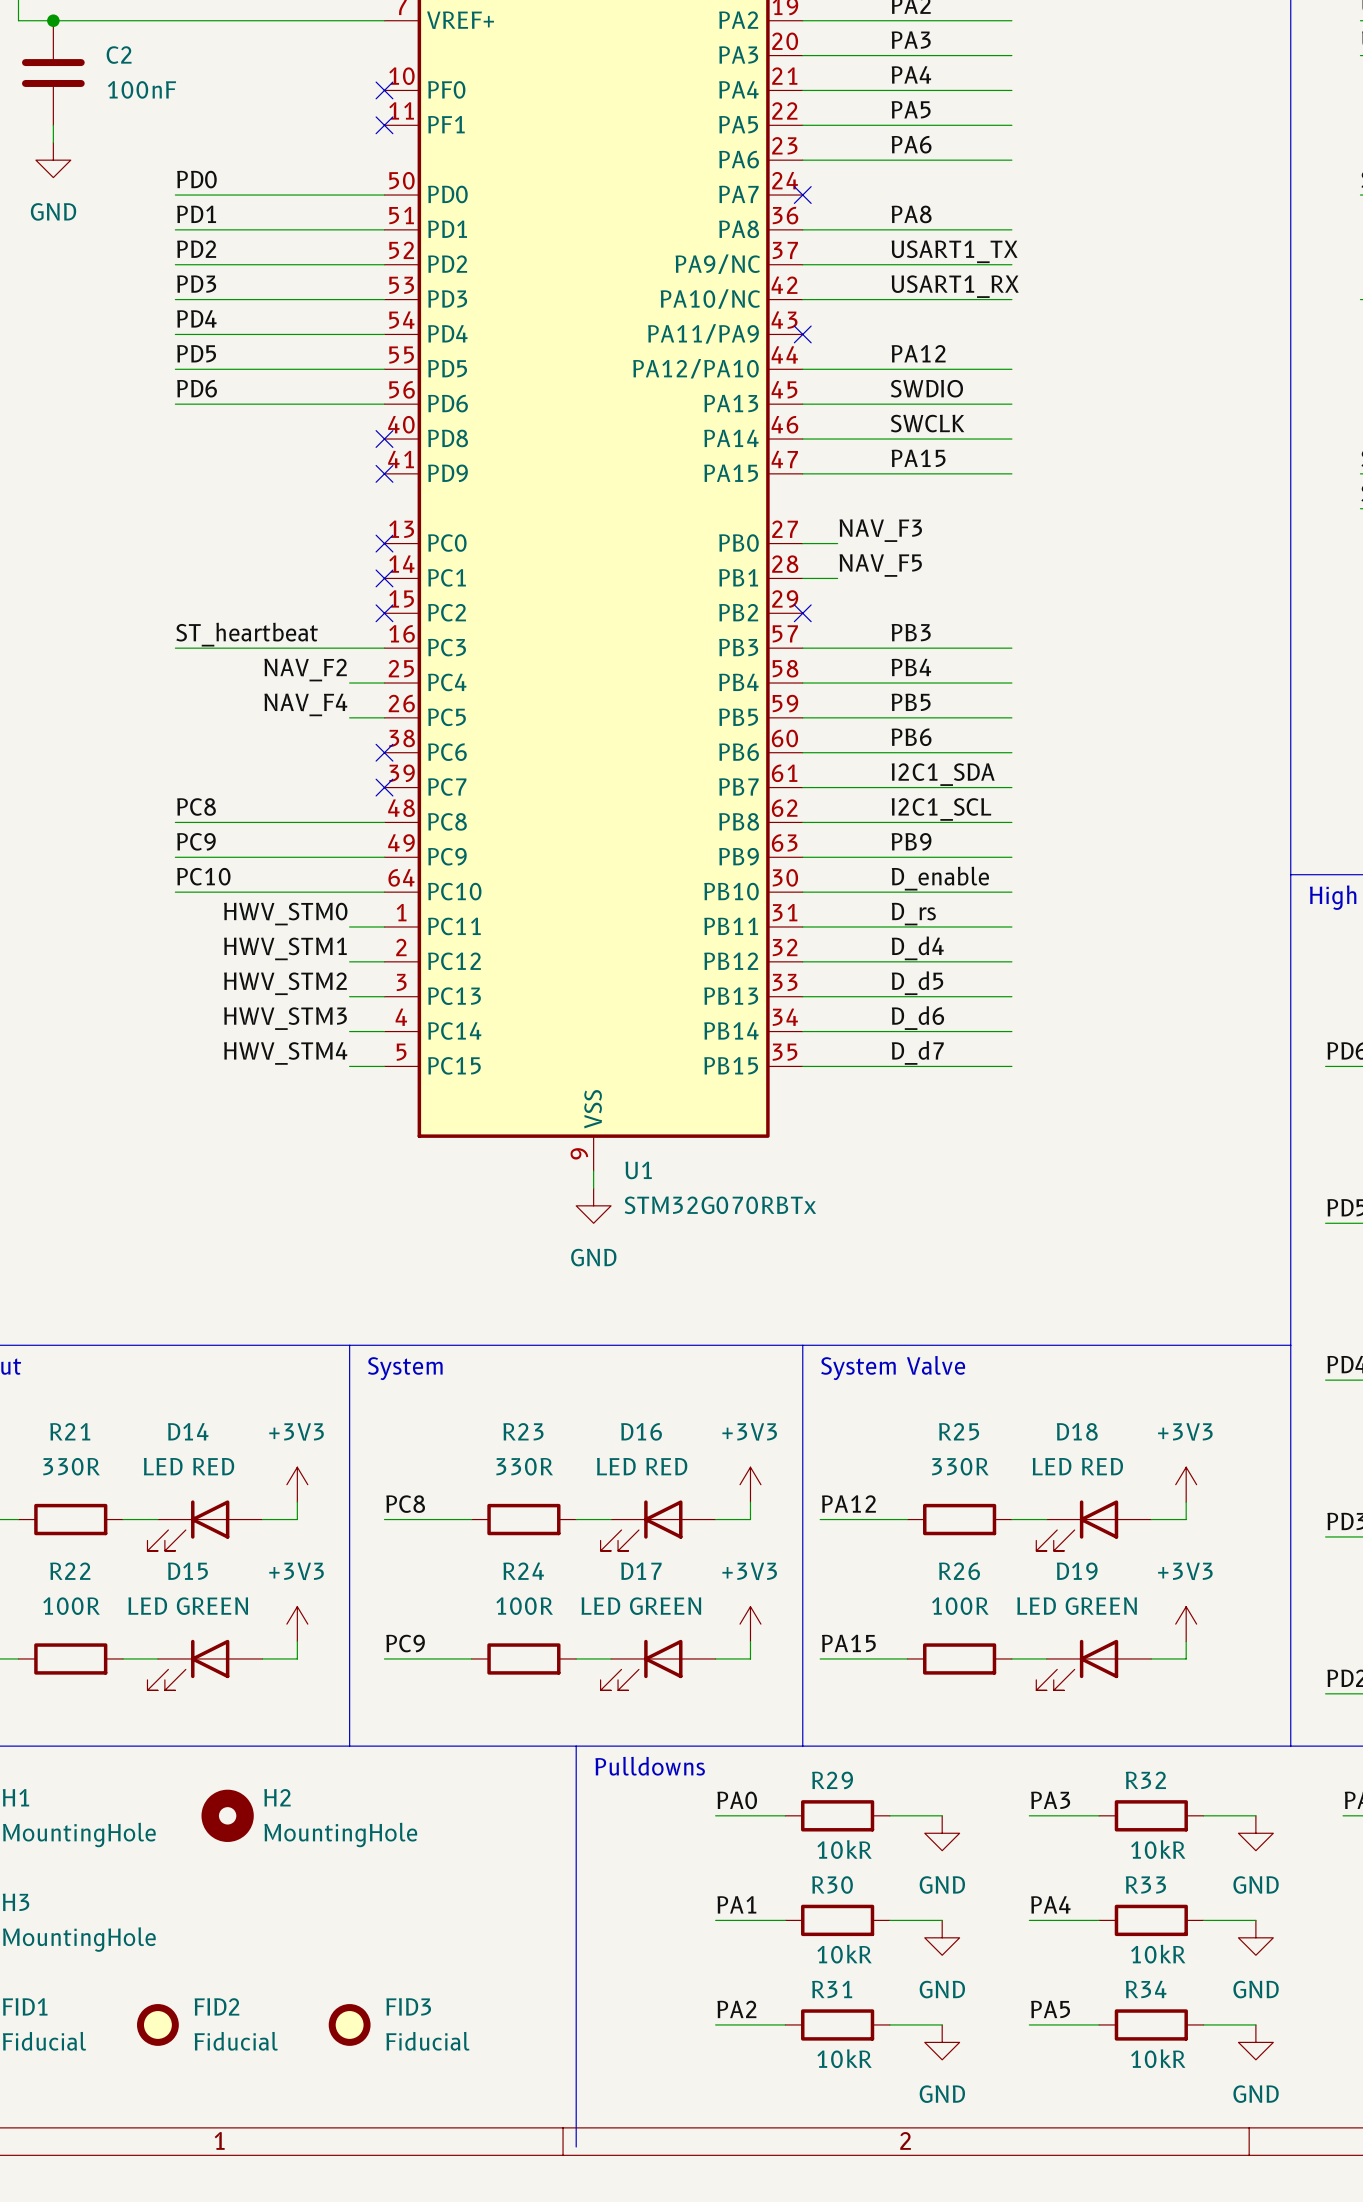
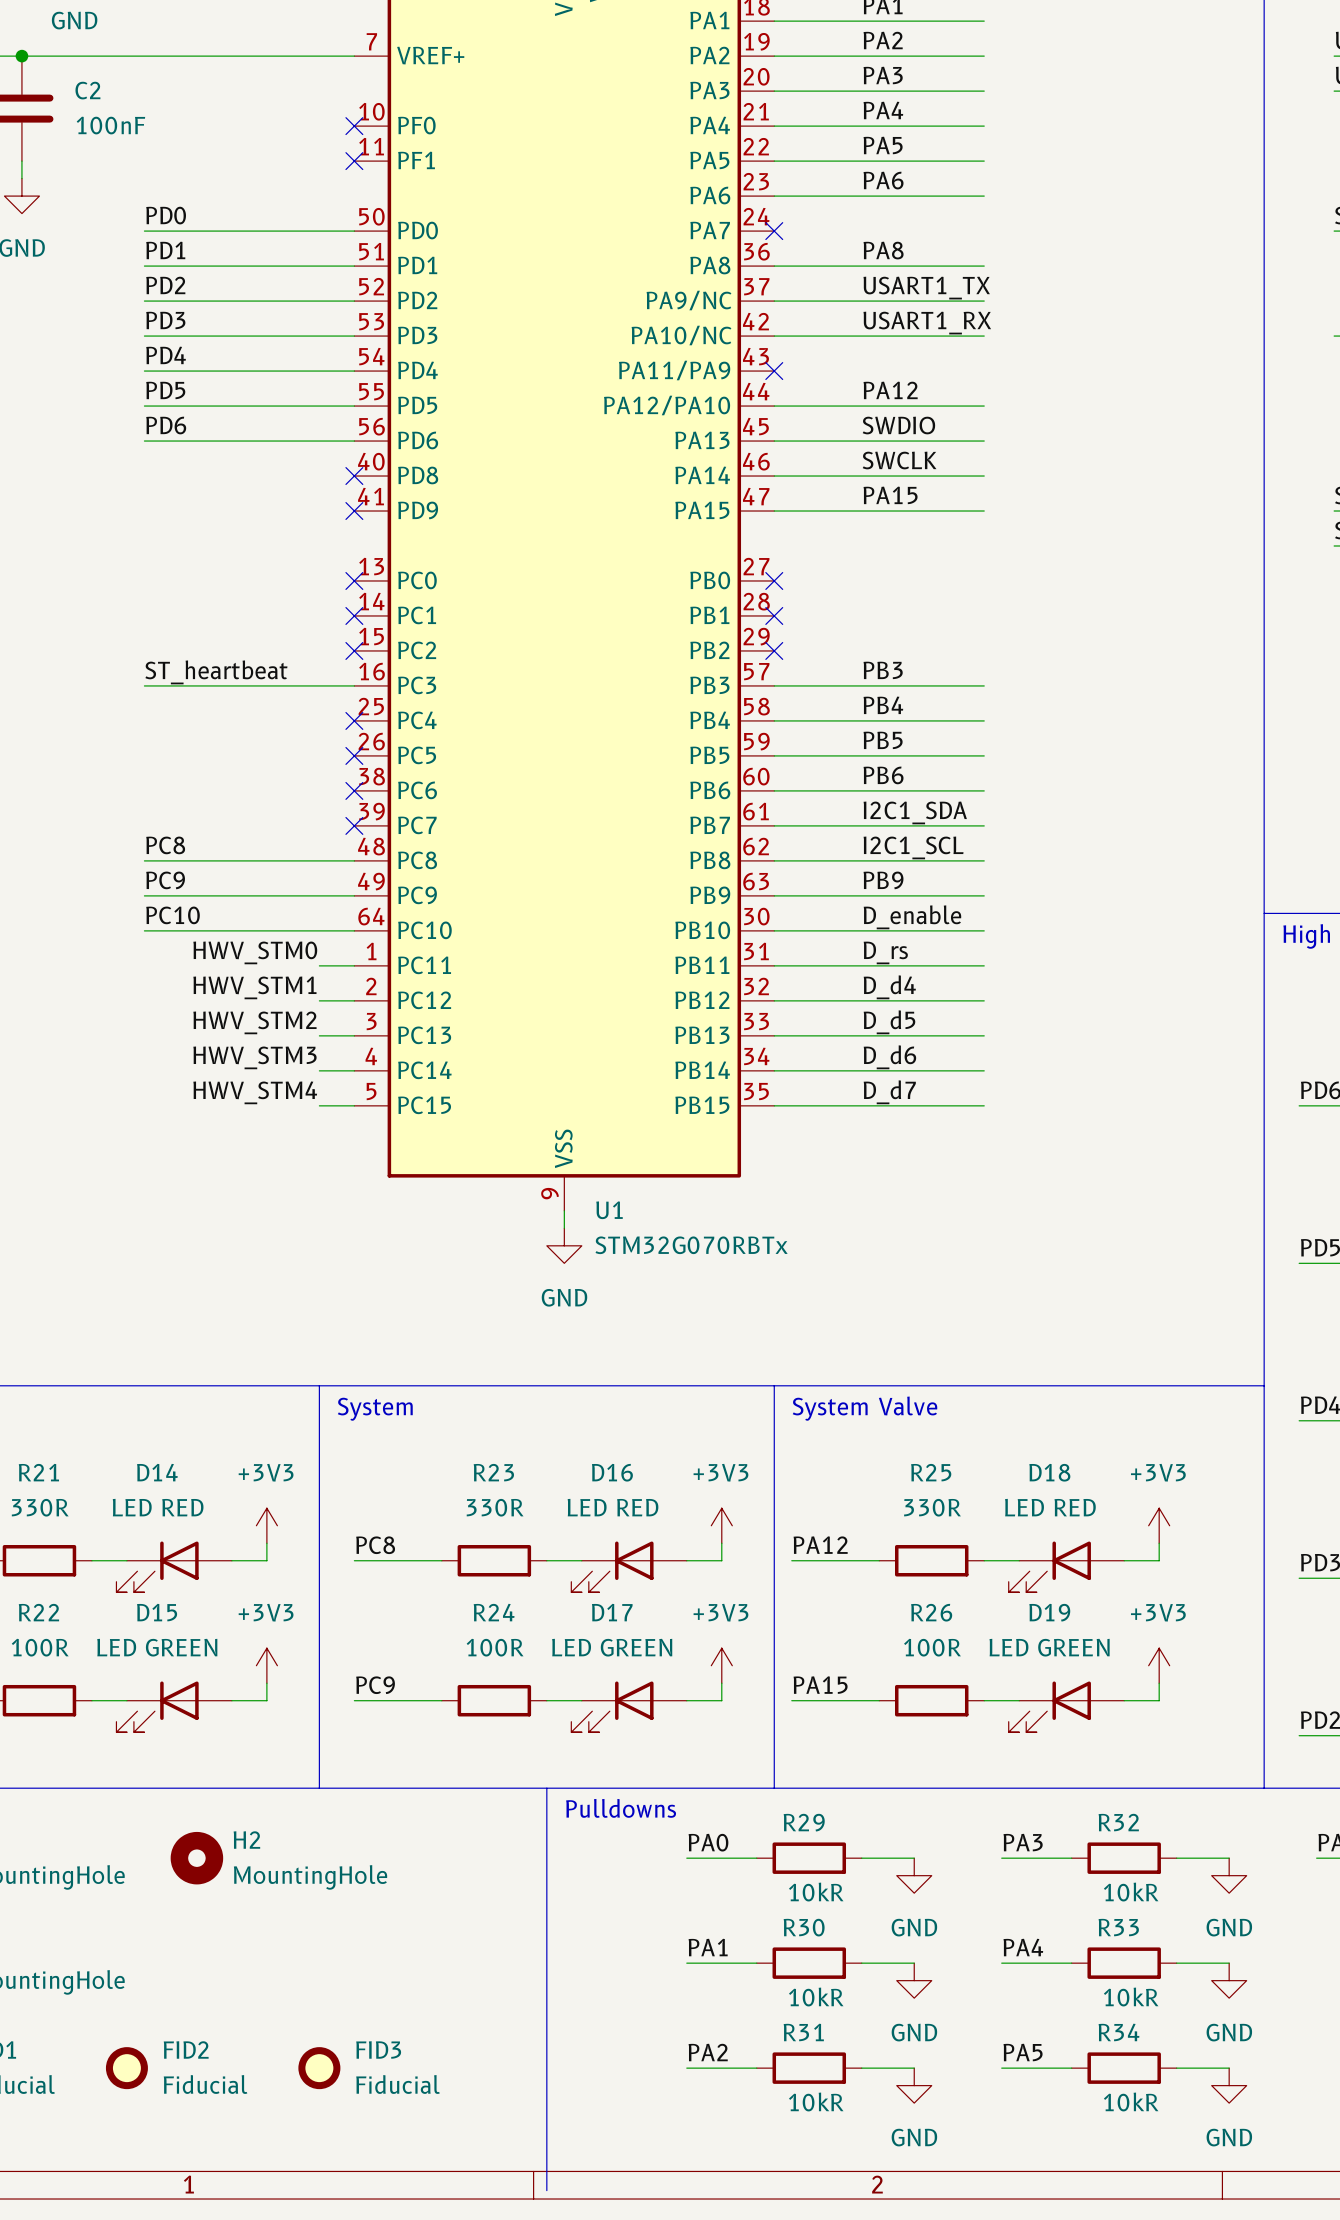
label: NAV_F3 (880, 530) -> none
wire: (802, 543) (837, 543) -> none
no-connect mark: none -> (774, 580)
label: NAV_F5 (880, 565) -> none
wire: (802, 578) (837, 578) -> none
no-connect mark: none -> (774, 615)
label: NAV_F2 (305, 670) -> none
wire: (349, 683) (384, 683) -> none
no-connect mark: none -> (354, 720)
label: NAV_F4 (305, 704) -> none
wire: (349, 717) (384, 717) -> none
no-connect mark: none -> (354, 755)

